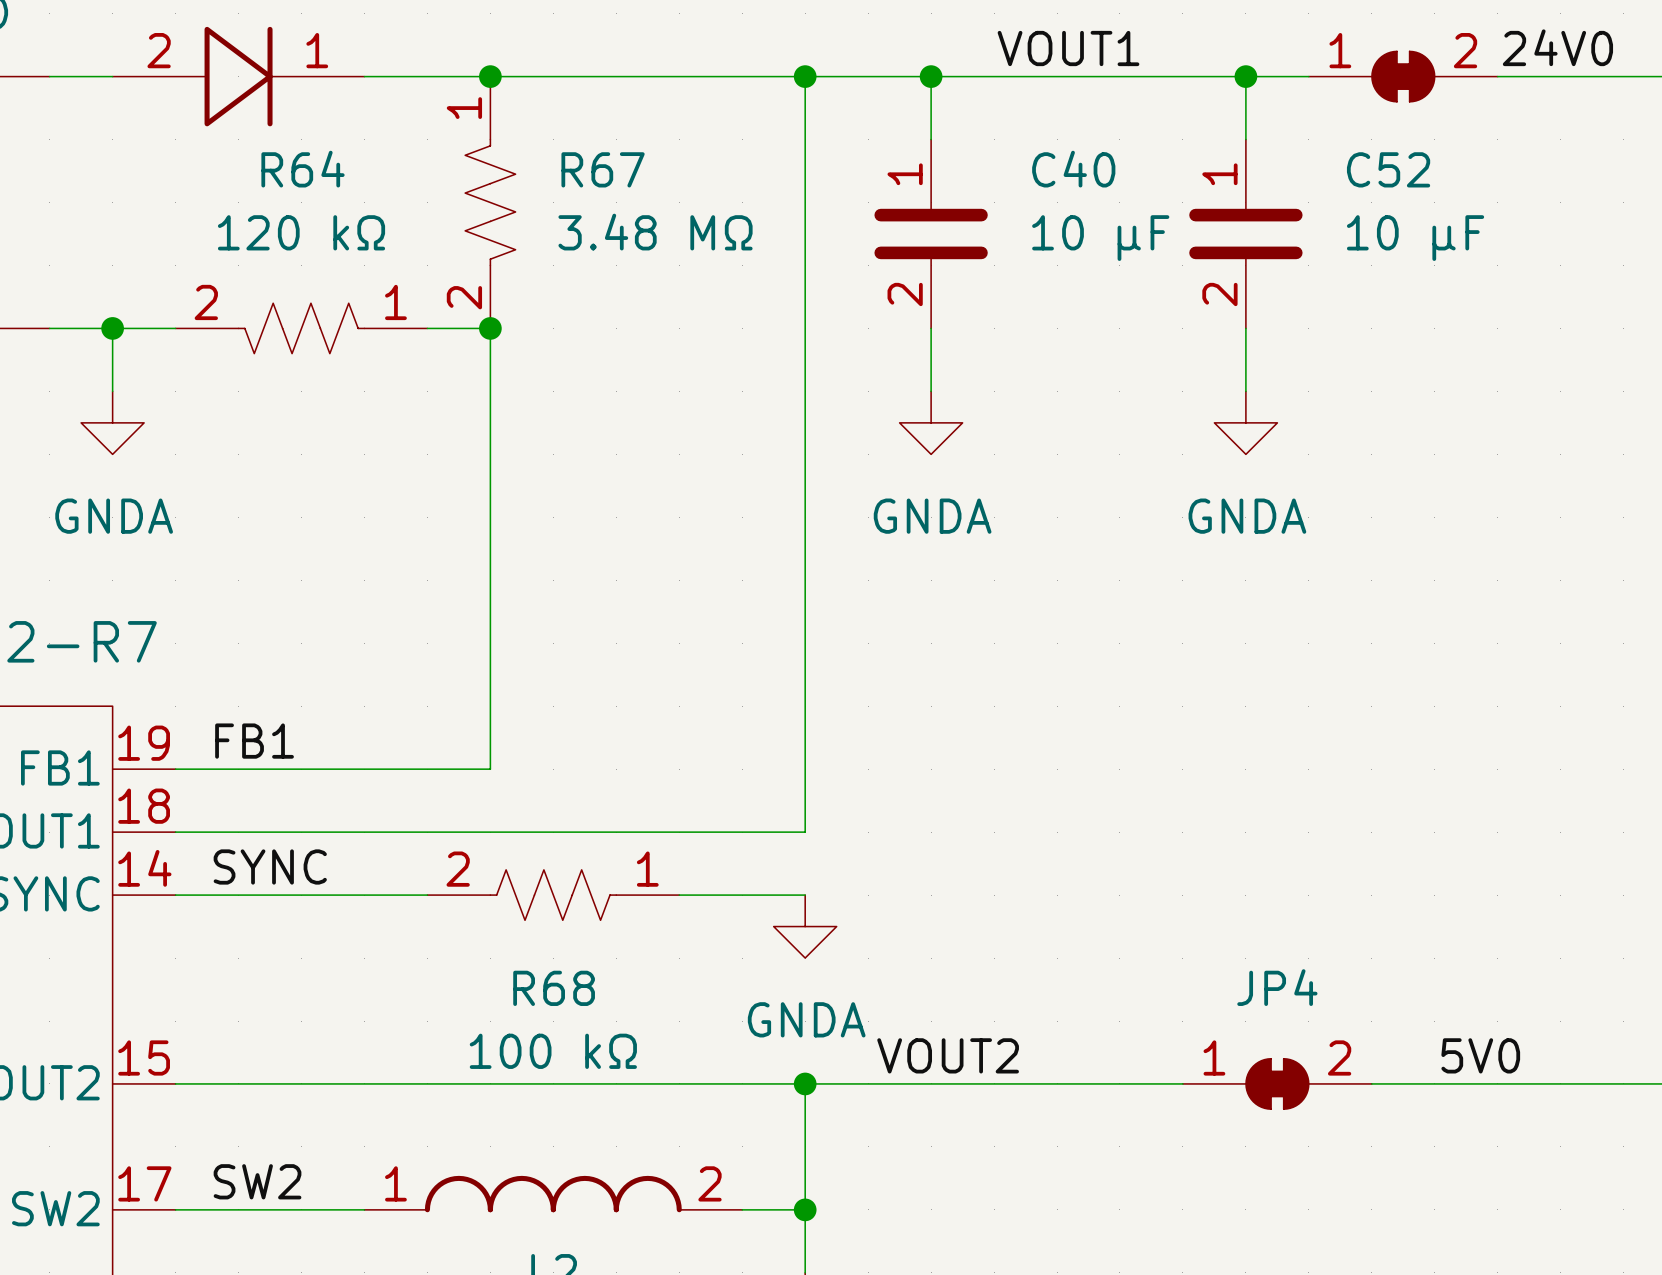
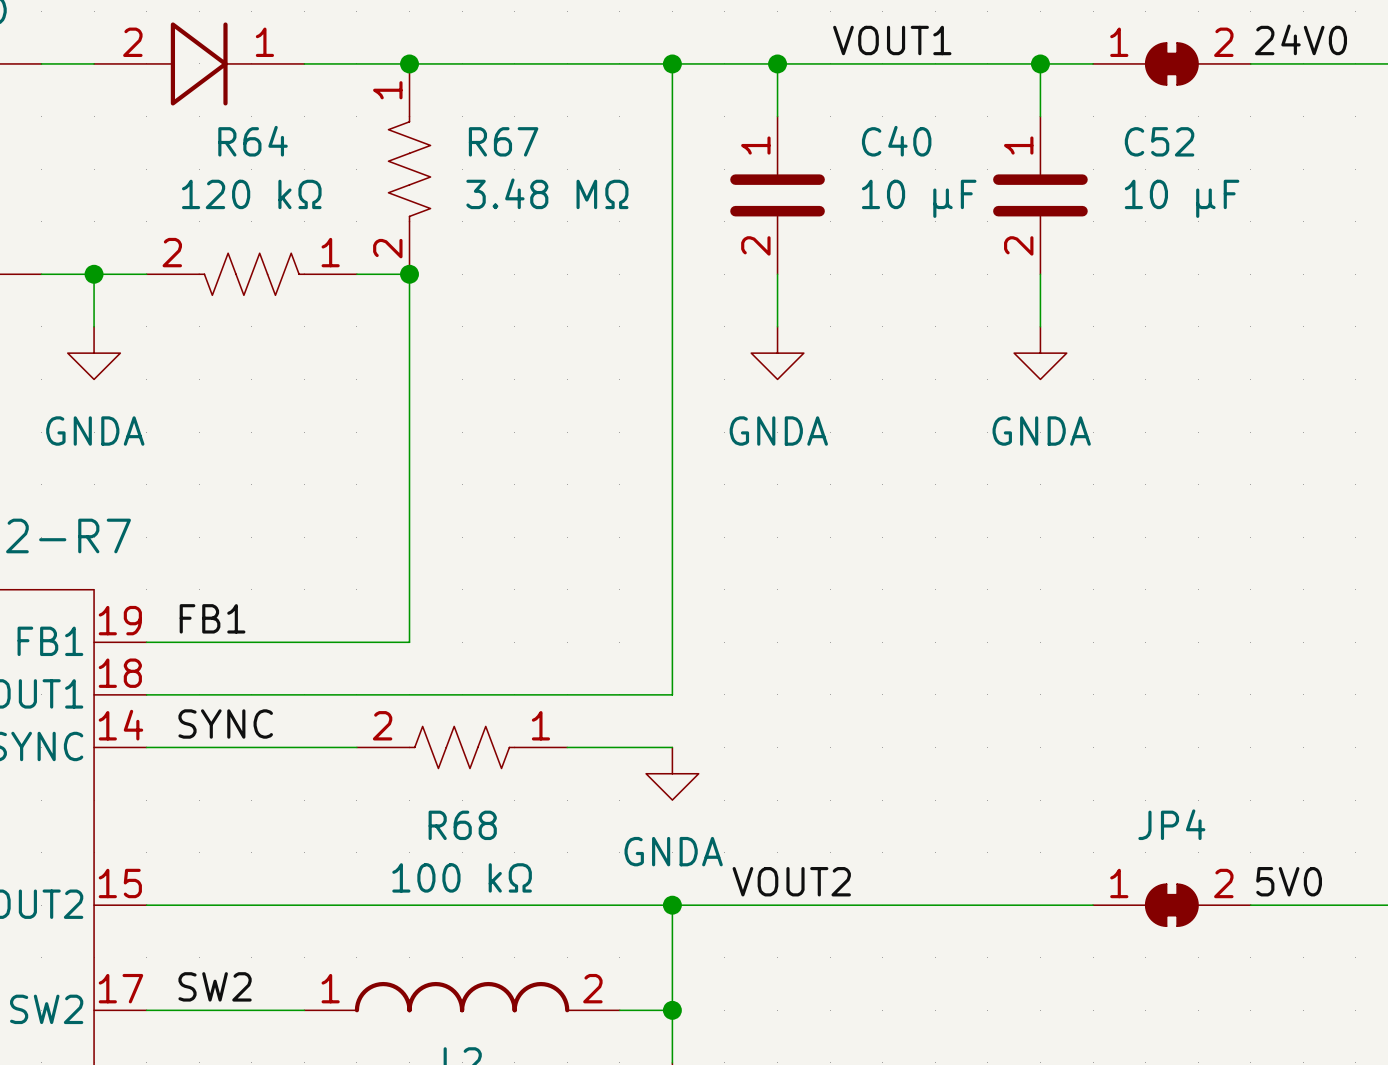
label position: 5V0 (1480, 1055) -> 5V0 (1289, 881)
JP4 position: (1277, 1083) -> (1171, 905)

